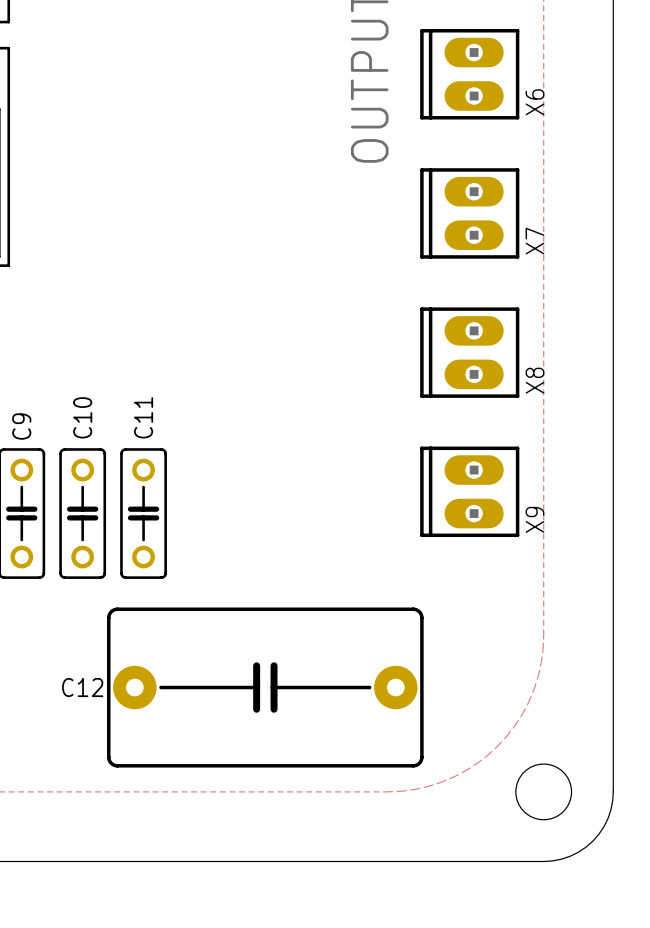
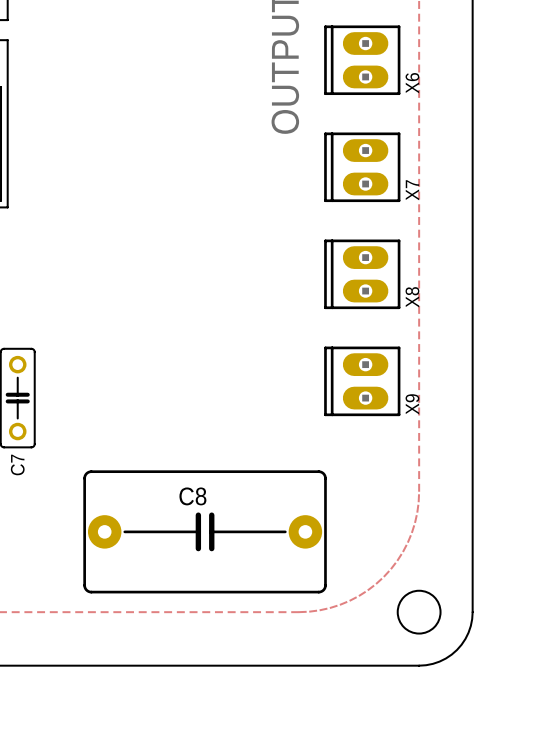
C9 name: C9 (21, 426) -> C7 (17, 464)
C10: (82, 513) -> none
C11: (143, 513) -> none
C12 name: C12 (82, 687) -> C8 (192, 496)

